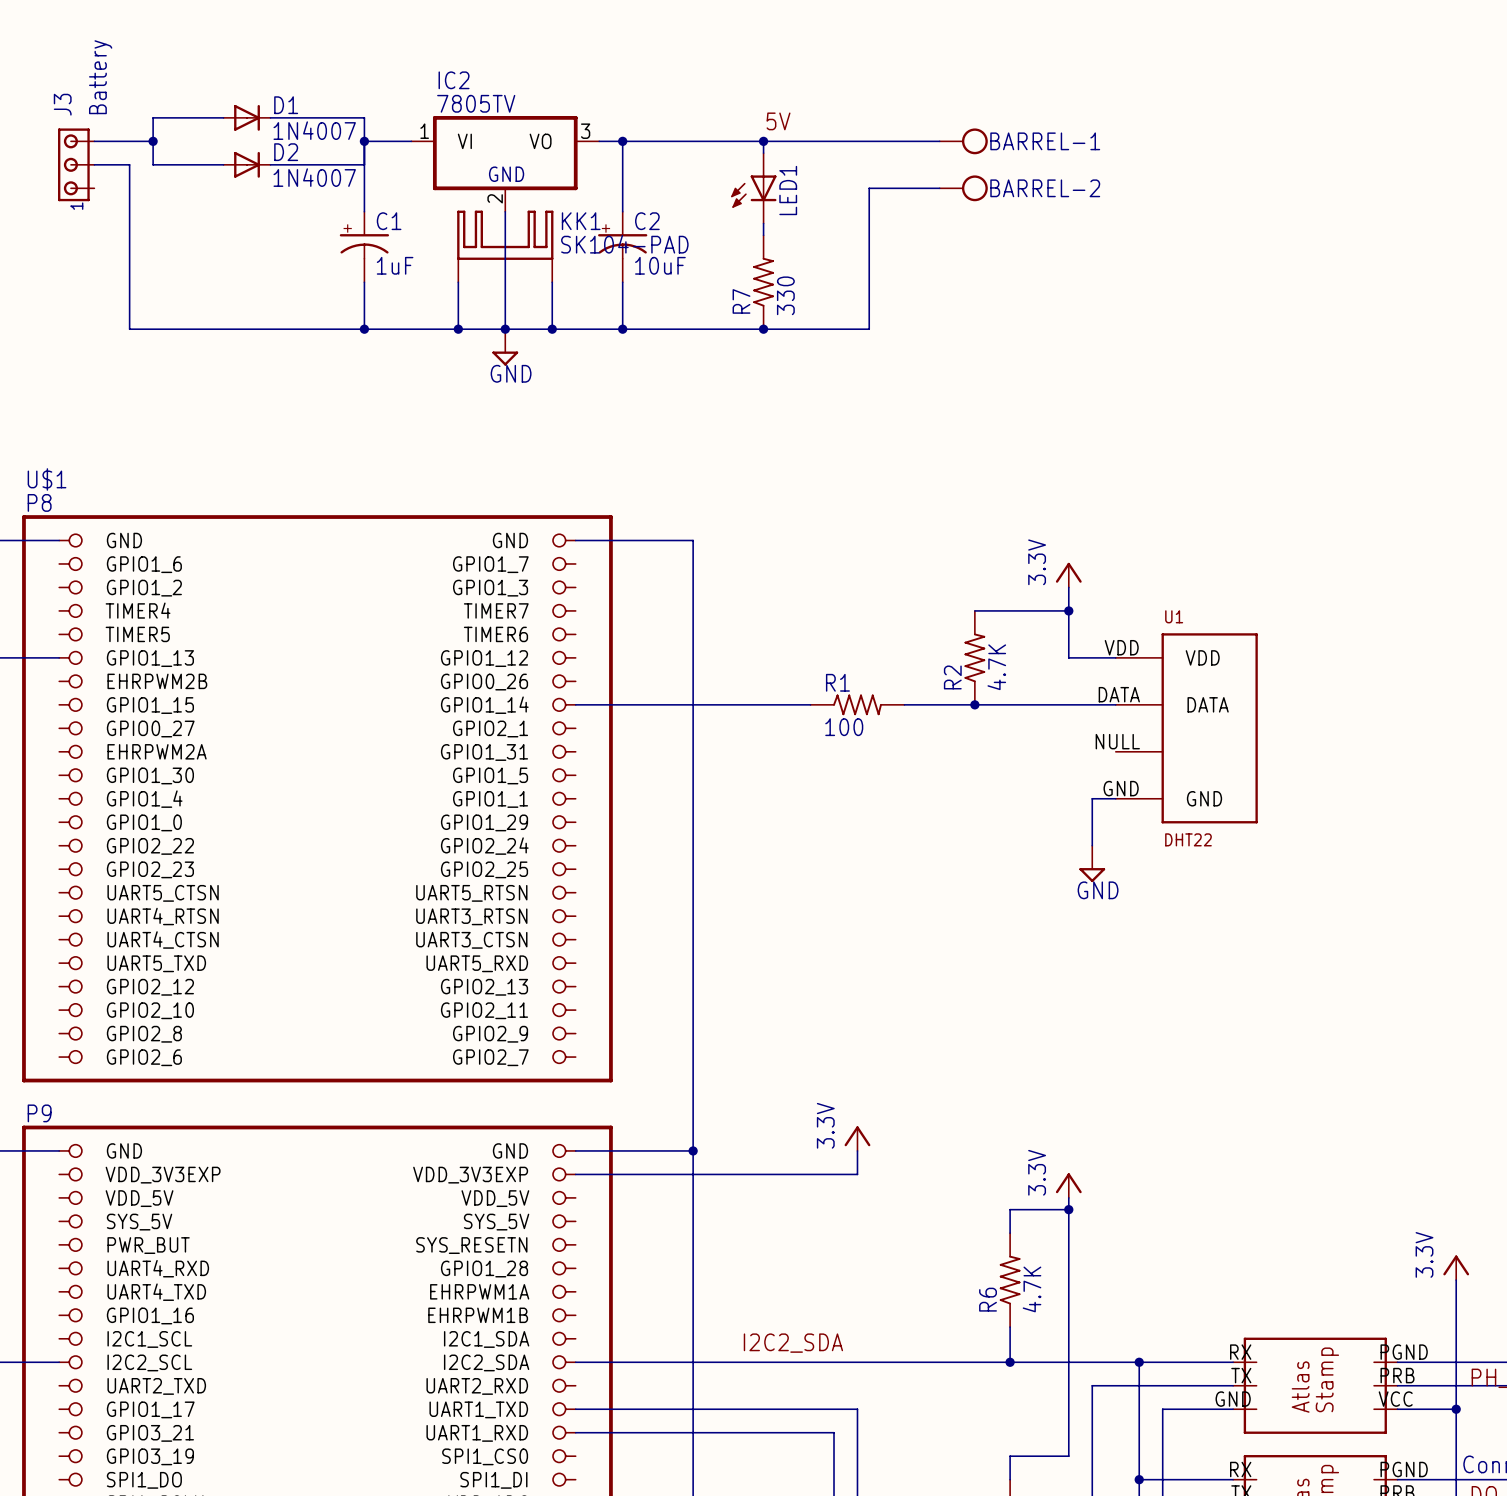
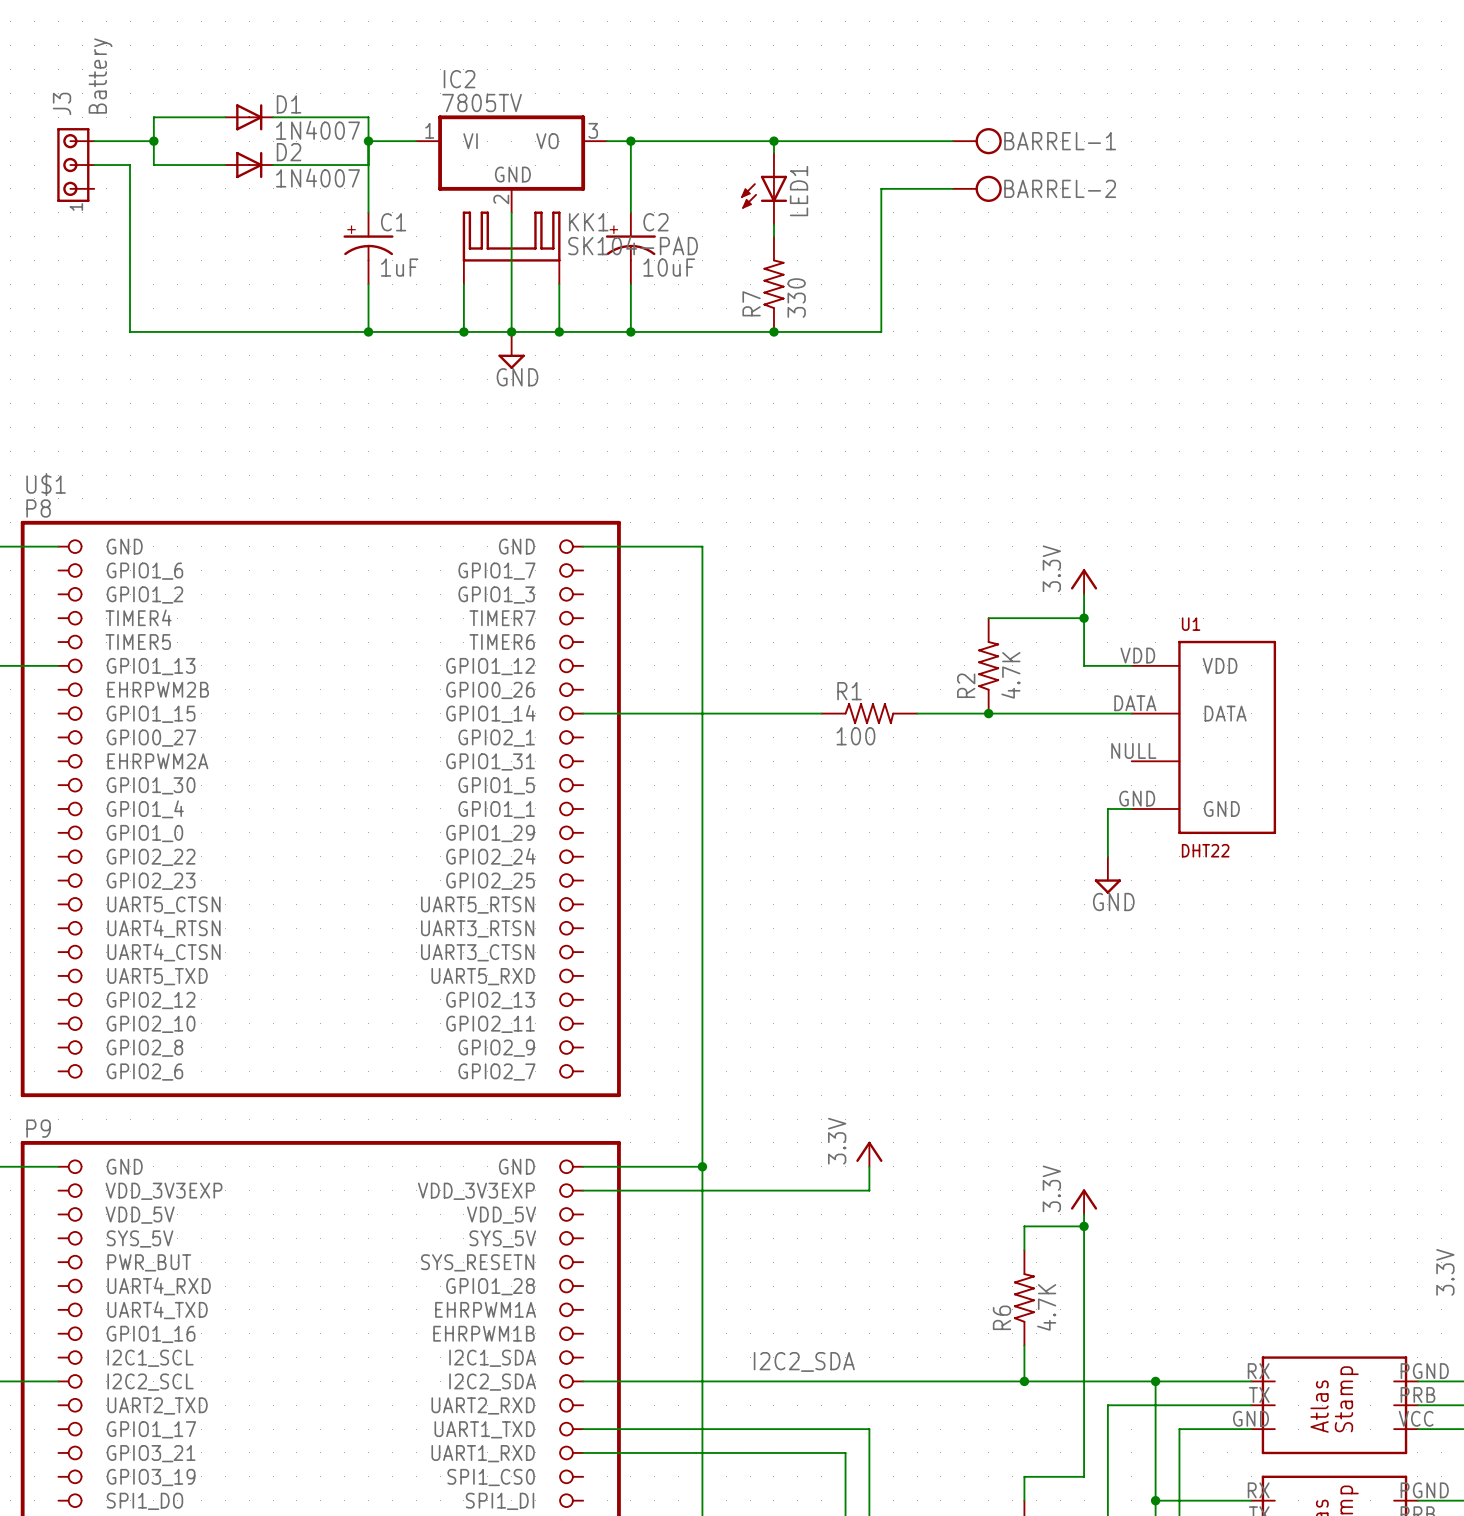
label: 5V (778, 121) -> none

